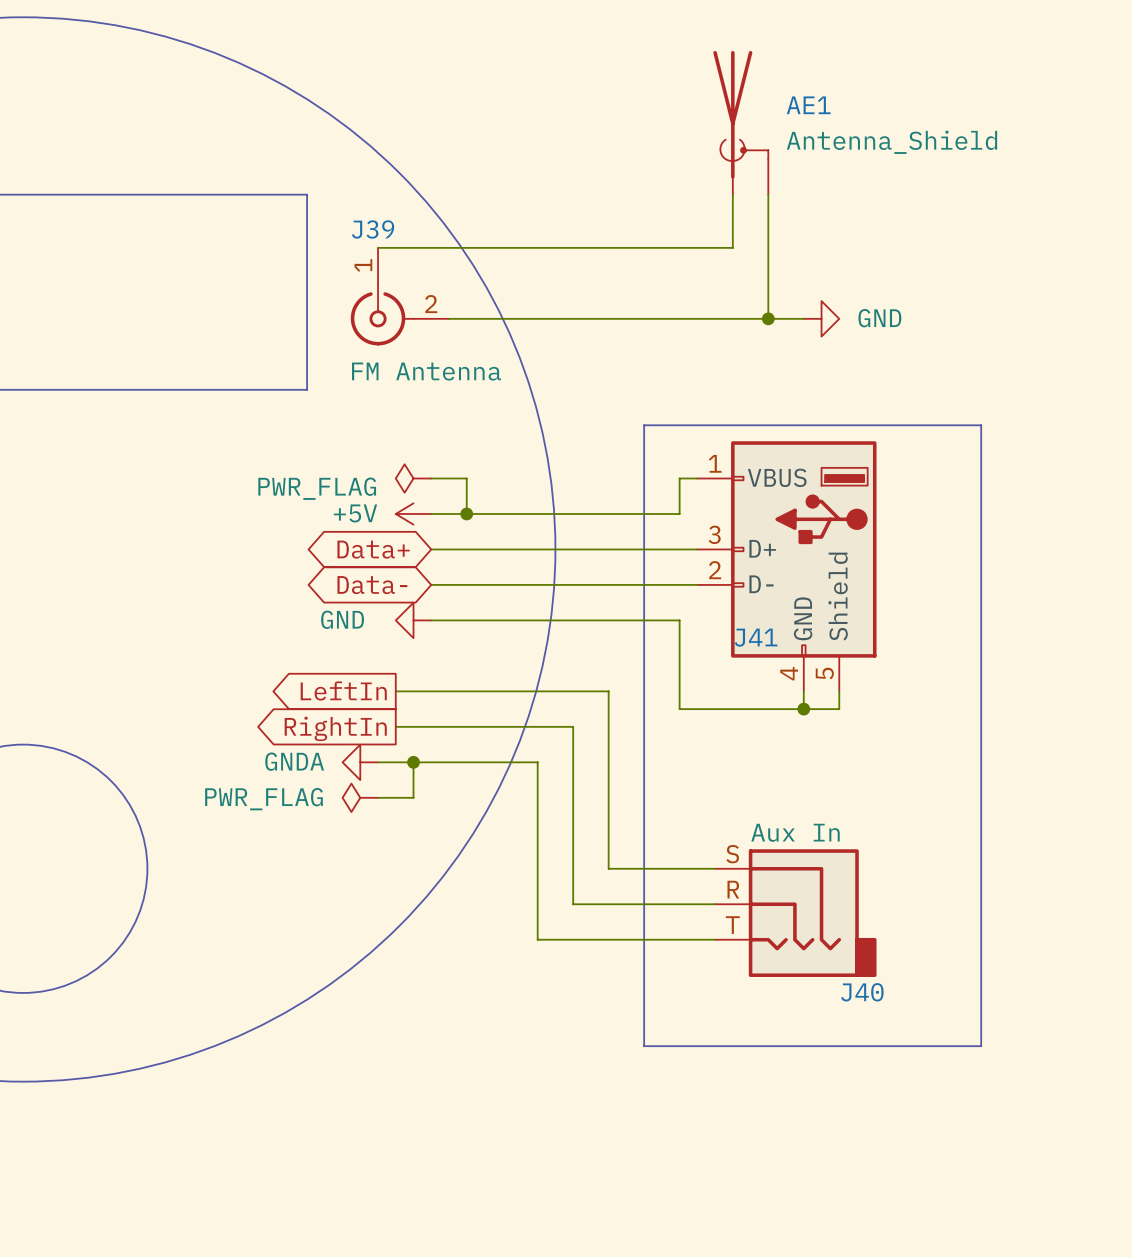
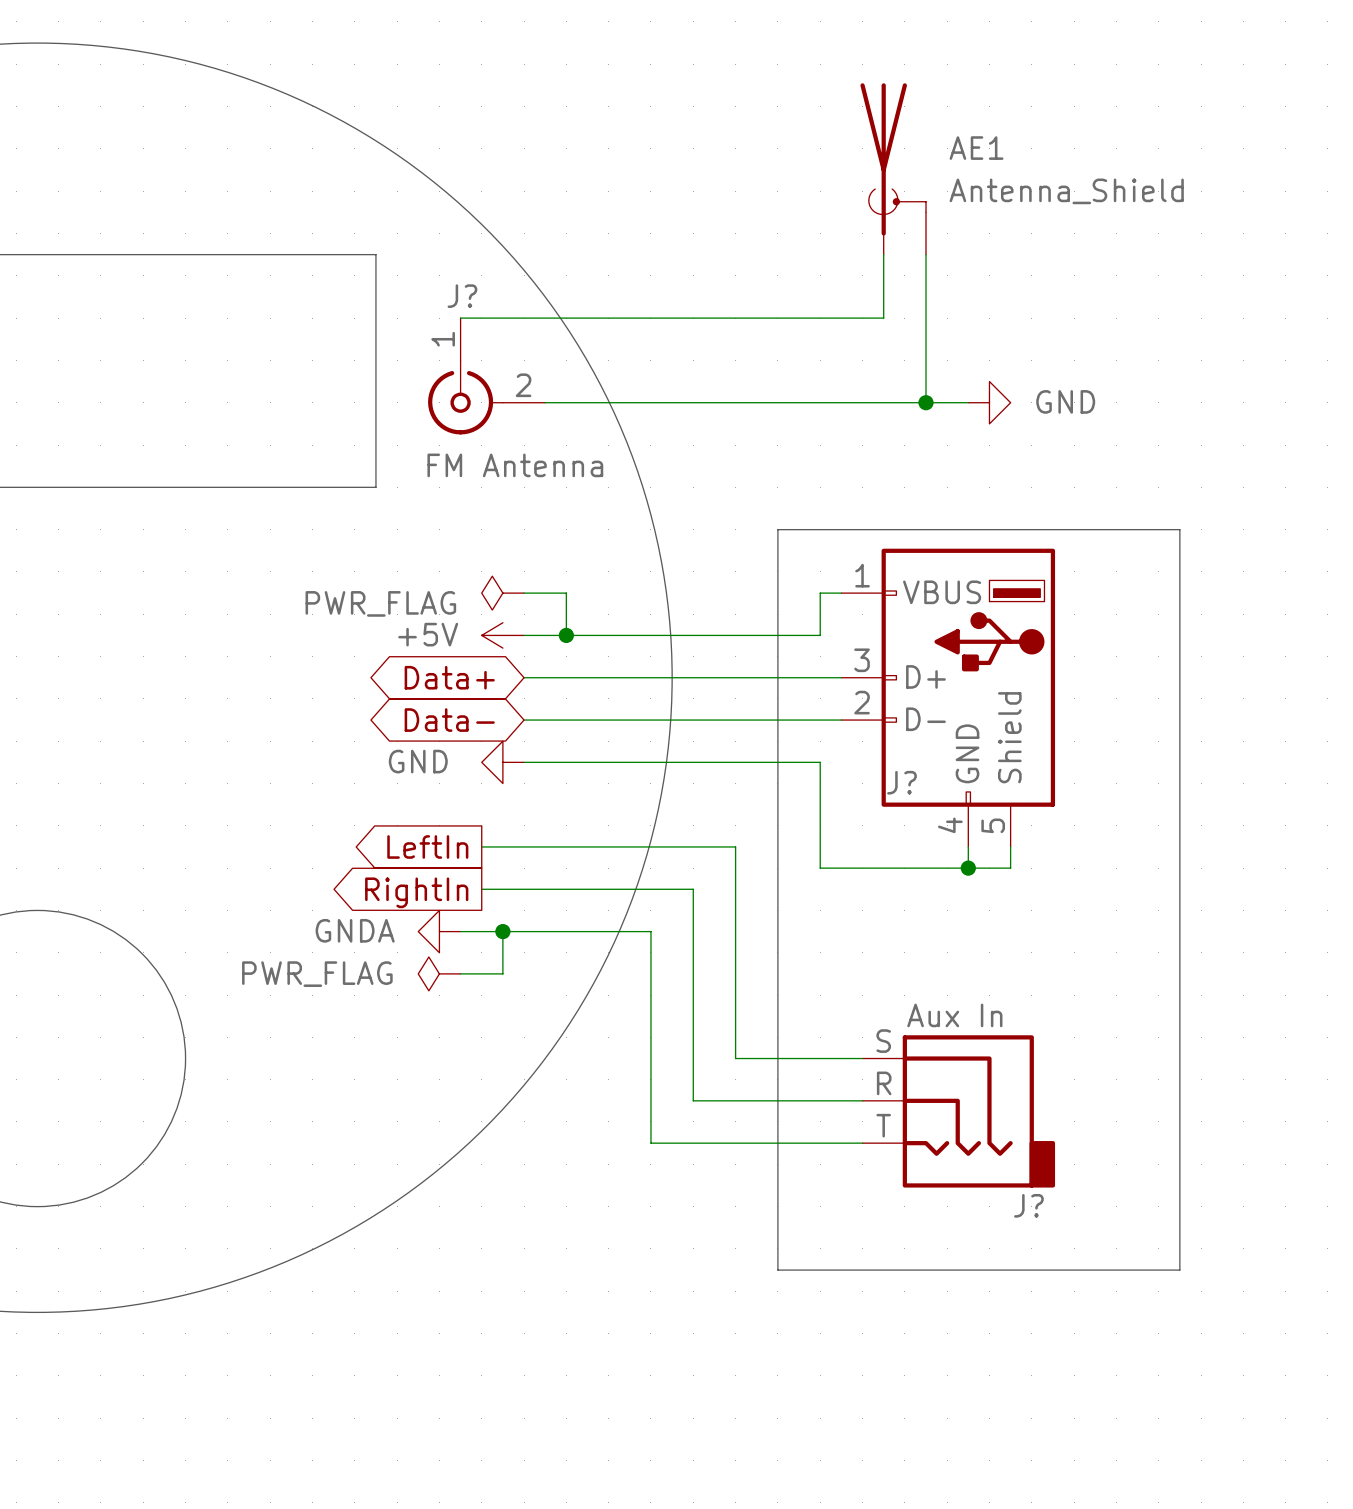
J39 name: J39 (373, 229) -> J? (462, 296)
J41 name: J41 (756, 637) -> J? (901, 782)
J40 name: J40 (862, 992) -> J? (1028, 1205)

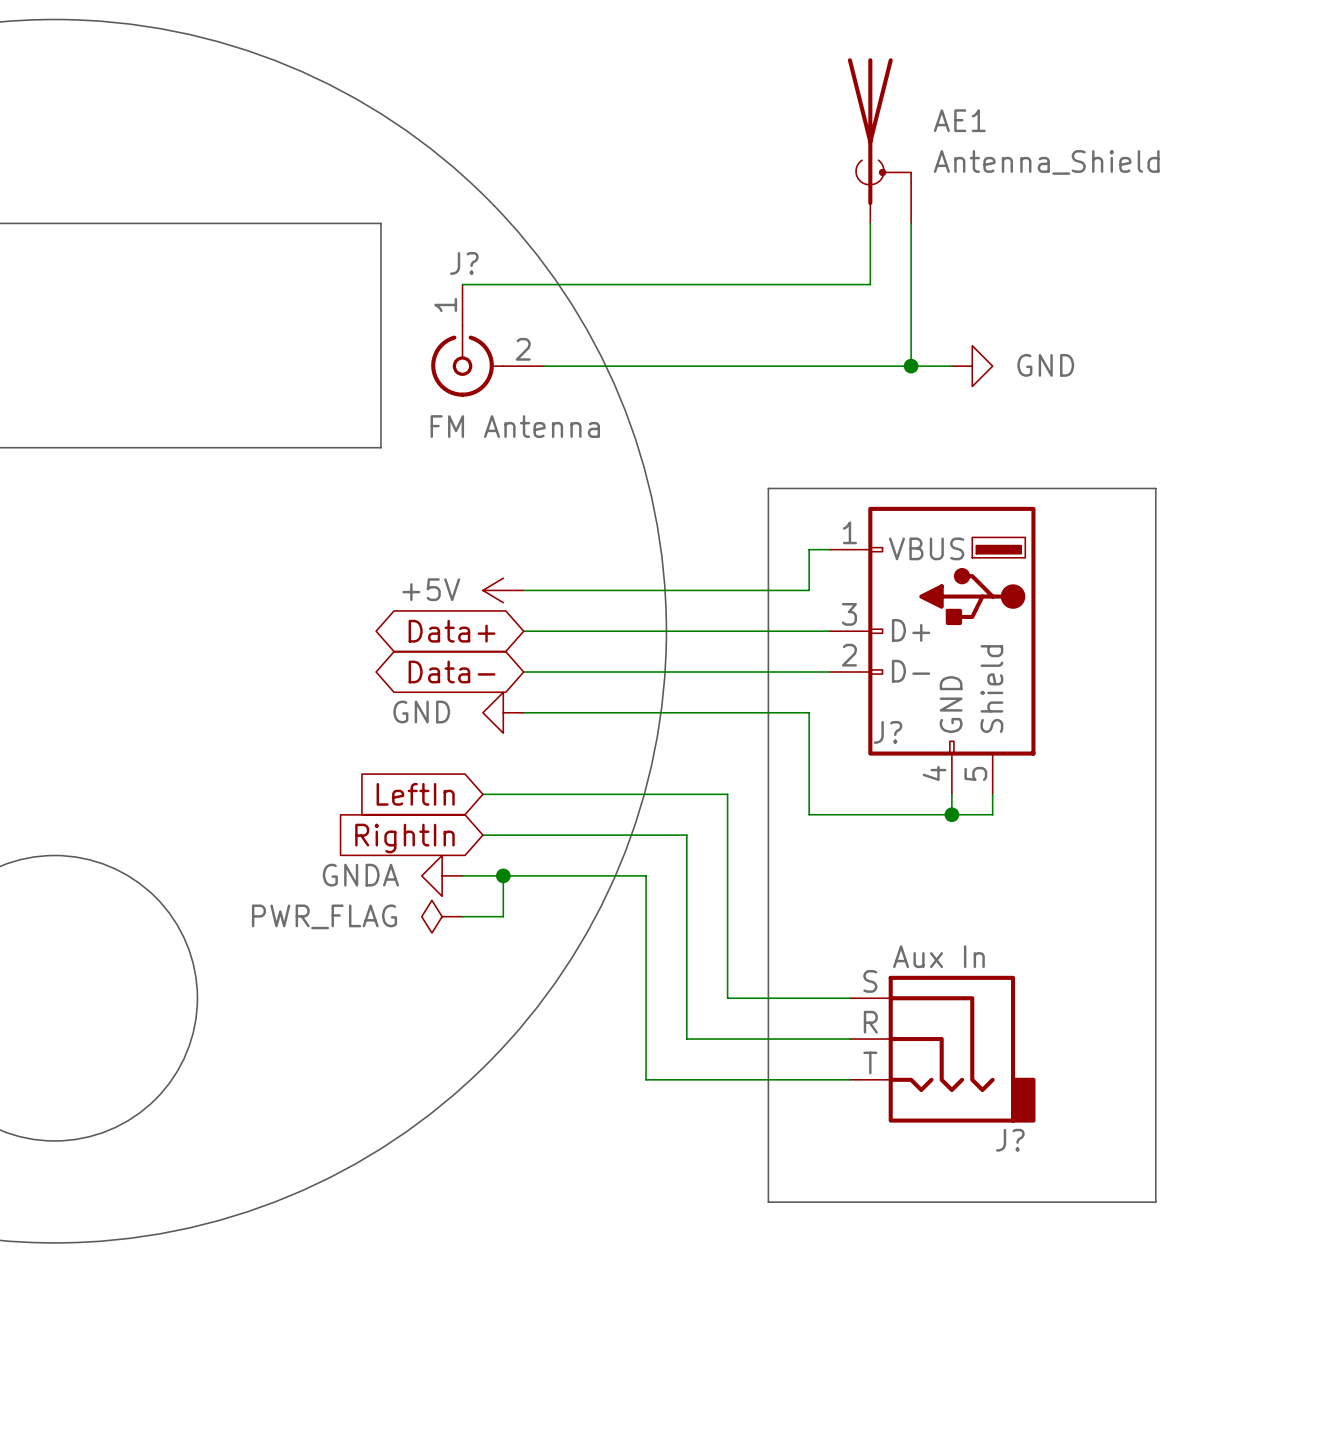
power symbol: PWR_FLAG (502, 593) -> none
wire: (524, 593) (566, 593) (566, 635) -> none
junction: (566, 635) -> none
global label shape: output (427, 846) -> input (415, 794)
global label shape: output (416, 892) -> input (404, 838)

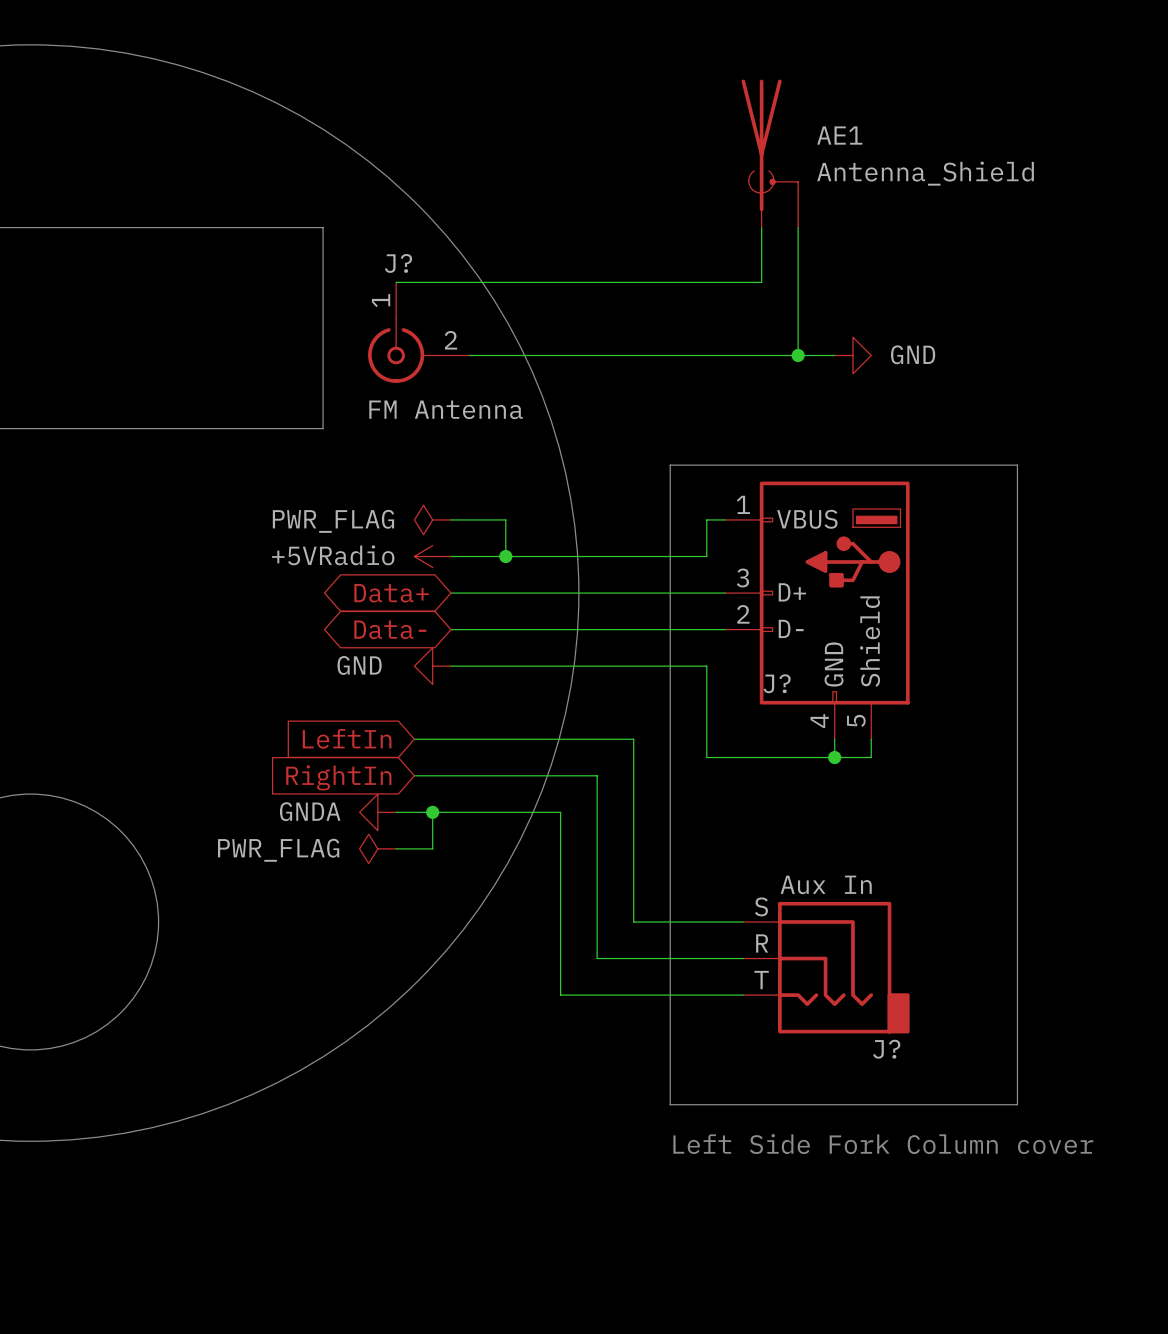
power symbol: none -> PWR_FLAG (432, 519)
wire: none -> (450, 519) (505, 519) (505, 556)
power symbol: +5V (503, 590) -> +5VRadio (432, 556)
junction: none -> (505, 556)
text: none -> Left Side Fork Column cover (883, 1144)

